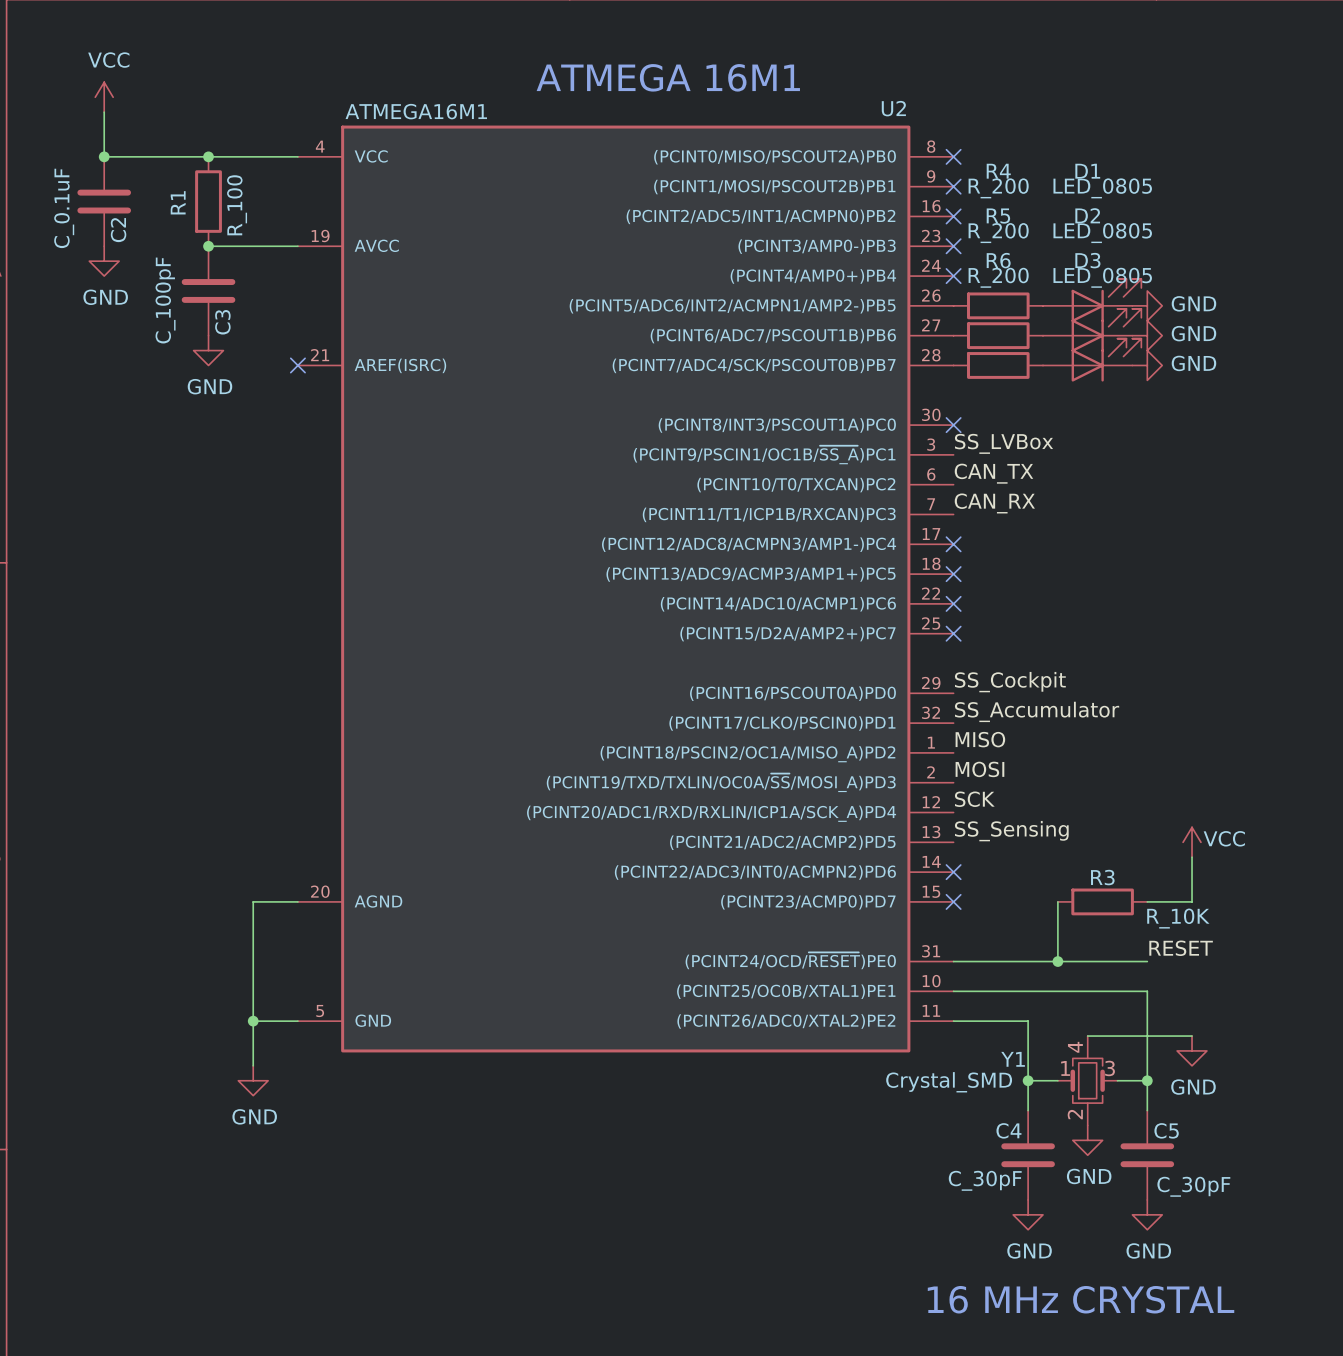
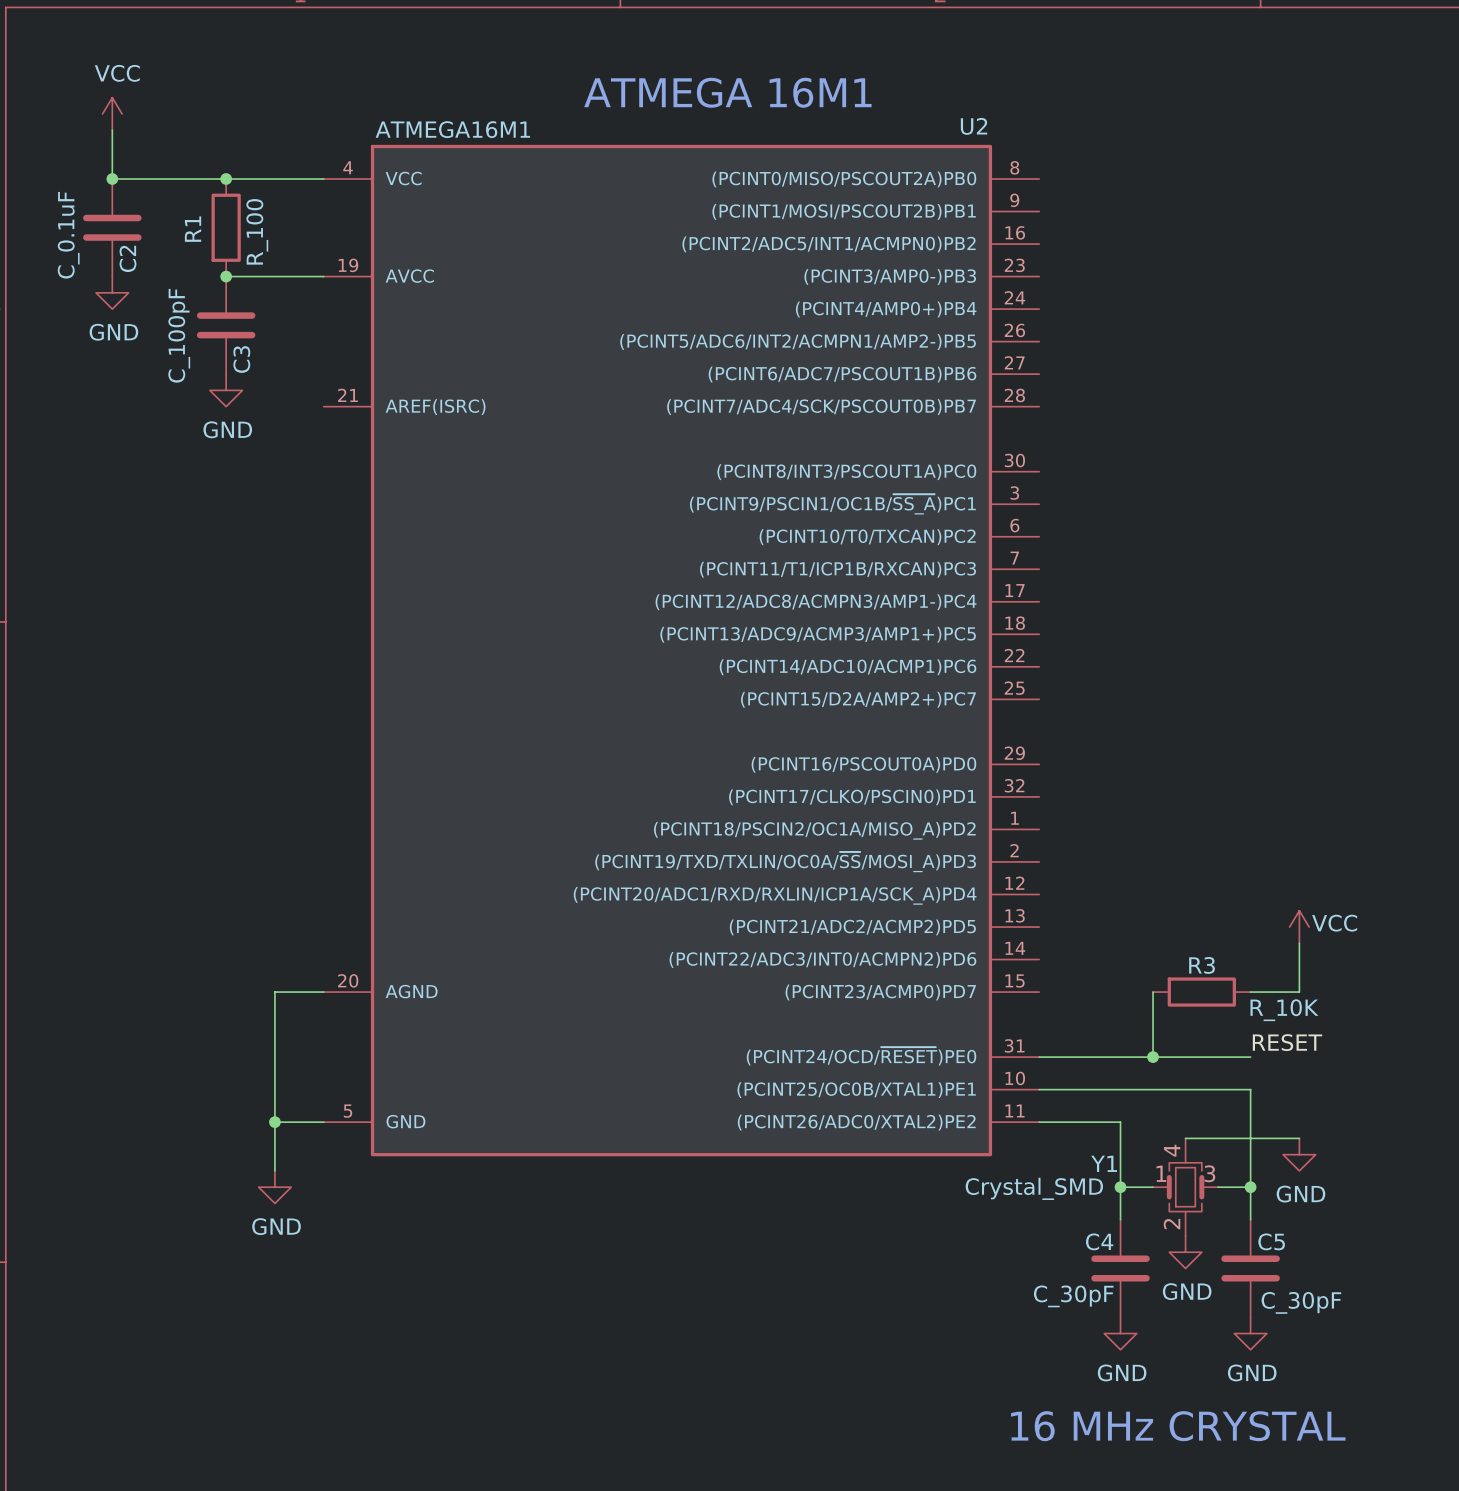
no-connect mark: (953, 156) -> none
no-connect mark: (953, 186) -> none
no-connect mark: (953, 216) -> none
no-connect mark: (953, 246) -> none
no-connect mark: (953, 276) -> none
D1: LED_0805 (1092, 300) -> none
R4: R_200 (998, 305) -> none
power symbol: GND (1147, 305) -> none
D2: LED_0805 (1092, 330) -> none
R5: R_200 (998, 335) -> none
power symbol: GND (1147, 335) -> none
D3: LED_0805 (1092, 360) -> none
no-connect mark: (297, 365) -> none
R6: R_200 (998, 365) -> none
power symbol: GND (1147, 365) -> none
no-connect mark: (953, 425) -> none
label: SS_LVBox (1004, 443) -> none
label: CAN_TX (993, 473) -> none
label: CAN_RX (994, 503) -> none
no-connect mark: (953, 544) -> none
no-connect mark: (953, 574) -> none
no-connect mark: (953, 603) -> none
no-connect mark: (953, 633) -> none
label: SS_Cockpit (1010, 682) -> none
label: SS_Accumulator (1037, 711) -> none
label: MISO (980, 739) -> none
label: MOSI (979, 769) -> none
label: SCK (974, 799) -> none
label: SS_Sensing (1011, 831) -> none
no-connect mark: (953, 872) -> none
no-connect mark: (953, 901) -> none

